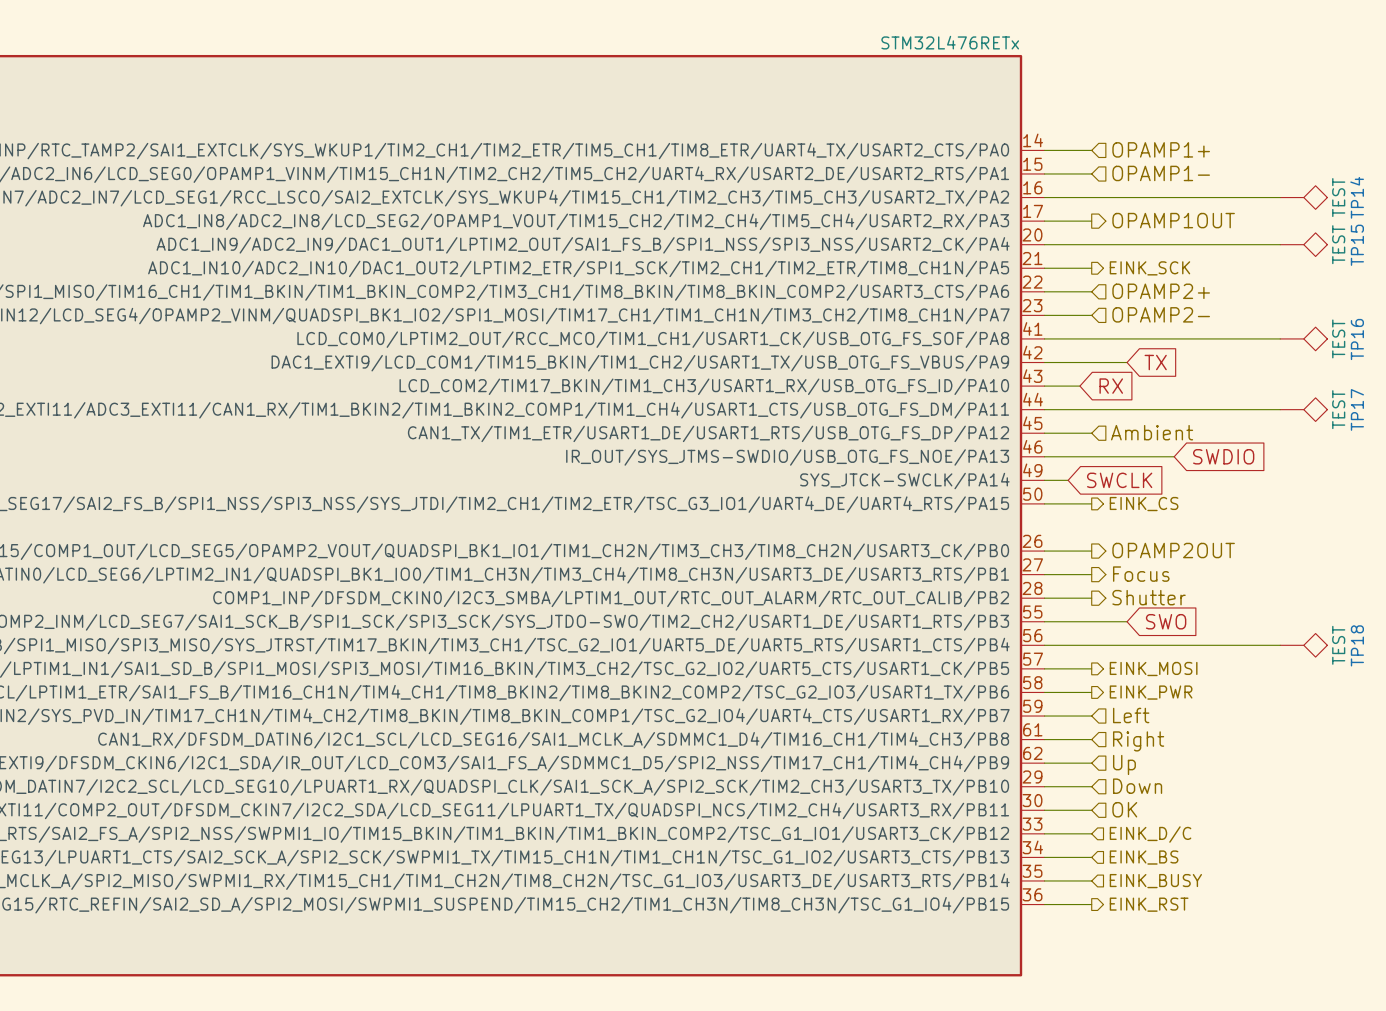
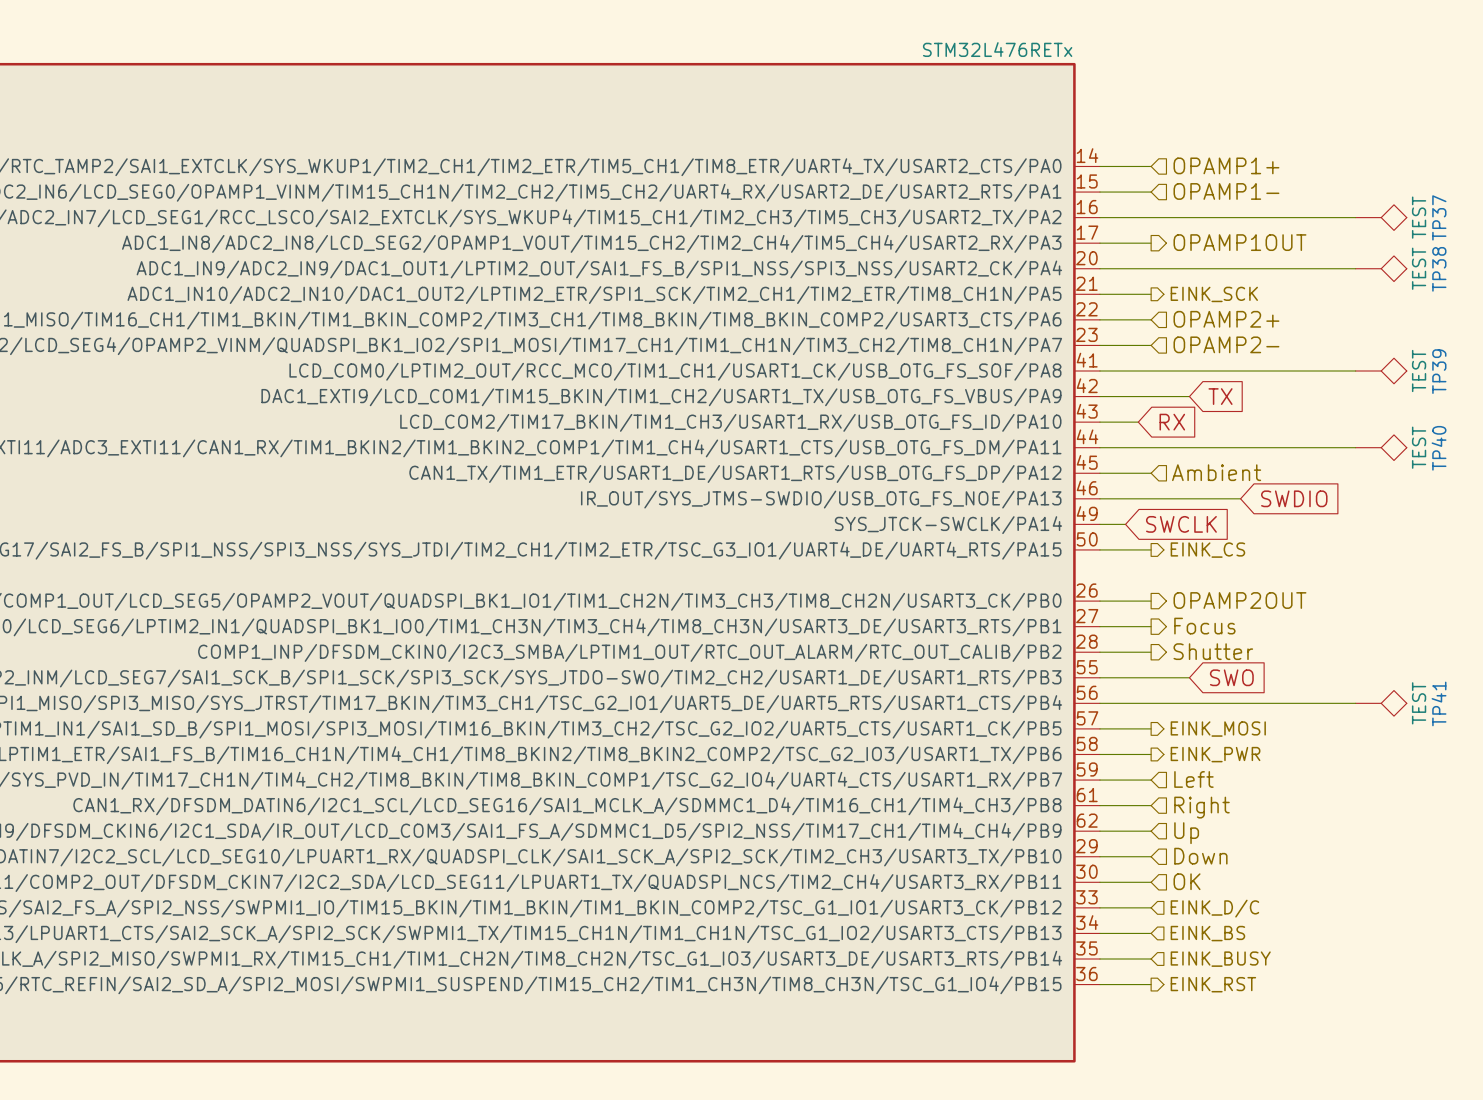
TP14 name: TP14 (1357, 197) -> TP37 (1439, 217)
TP15 name: TP15 (1357, 245) -> TP38 (1439, 269)
TP16 name: TP16 (1357, 339) -> TP39 (1439, 371)
TP17 name: TP17 (1357, 409) -> TP40 (1439, 448)
TP18 name: TP18 (1357, 645) -> TP41 (1439, 703)

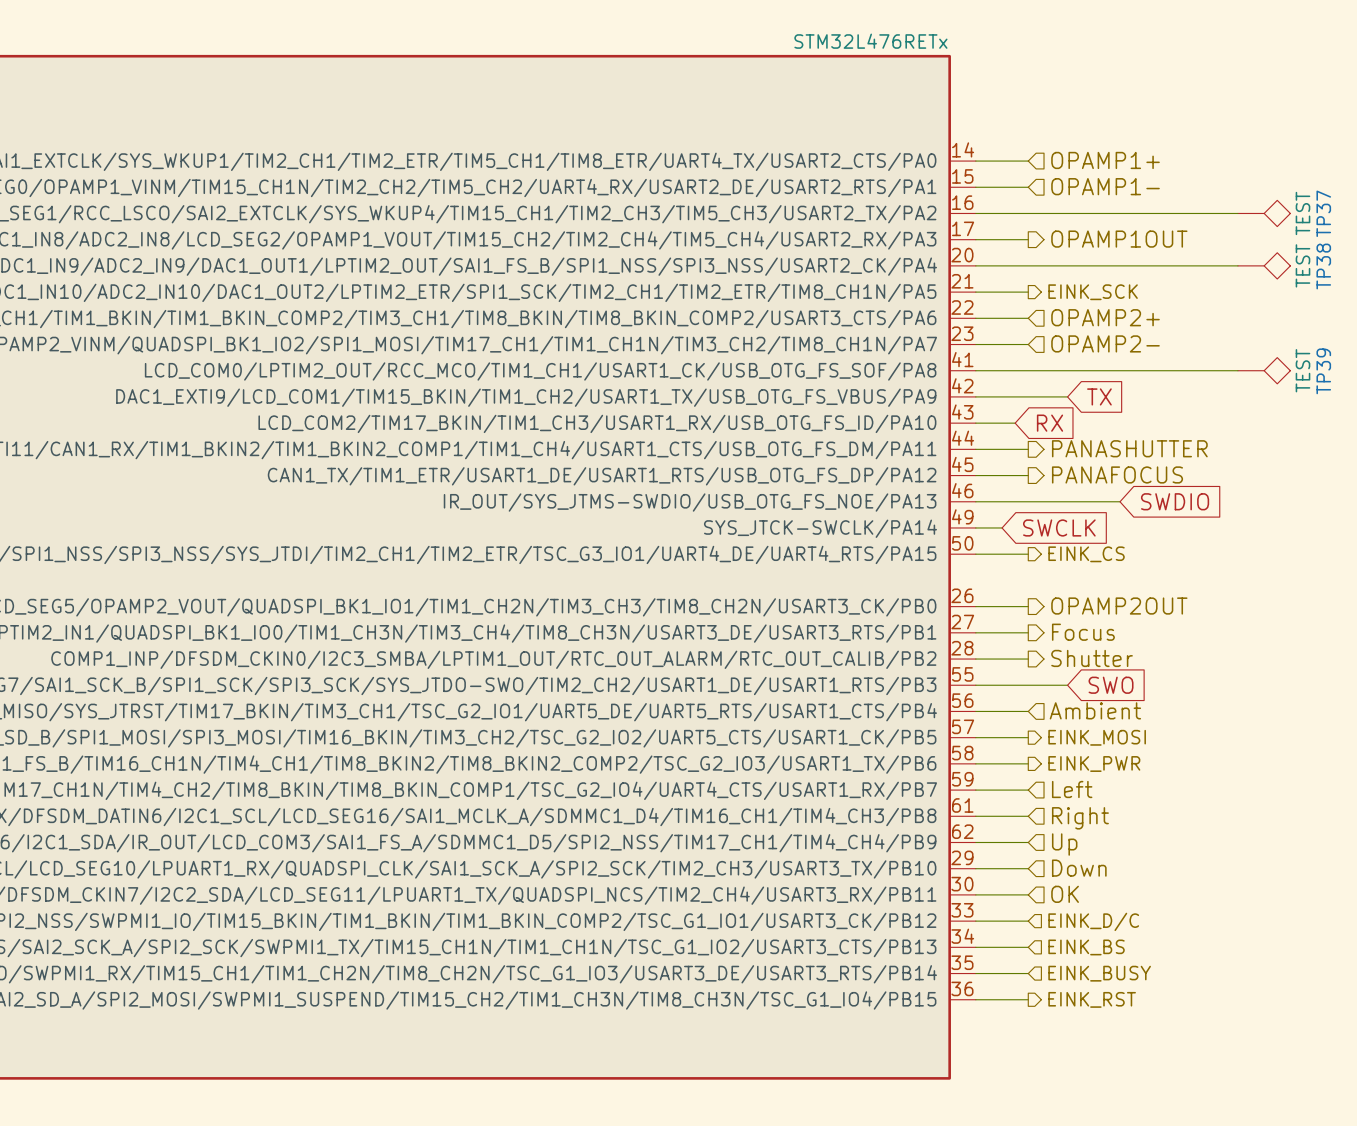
wire: (1151, 447) (1355, 447) -> none
hierarchical label: none -> PANASHUTTER (1129, 448)
TP40: TEST (1381, 447) -> none
hierarchical label shape: input (1216, 472) -> output (1117, 474)
hierarchical label: Ambient (1216, 472) -> PANAFOCUS (1117, 474)
hierarchical label: none -> Ambient (1095, 710)
wire: (1151, 703) (1355, 703) -> none
TP41: TEST (1381, 703) -> none

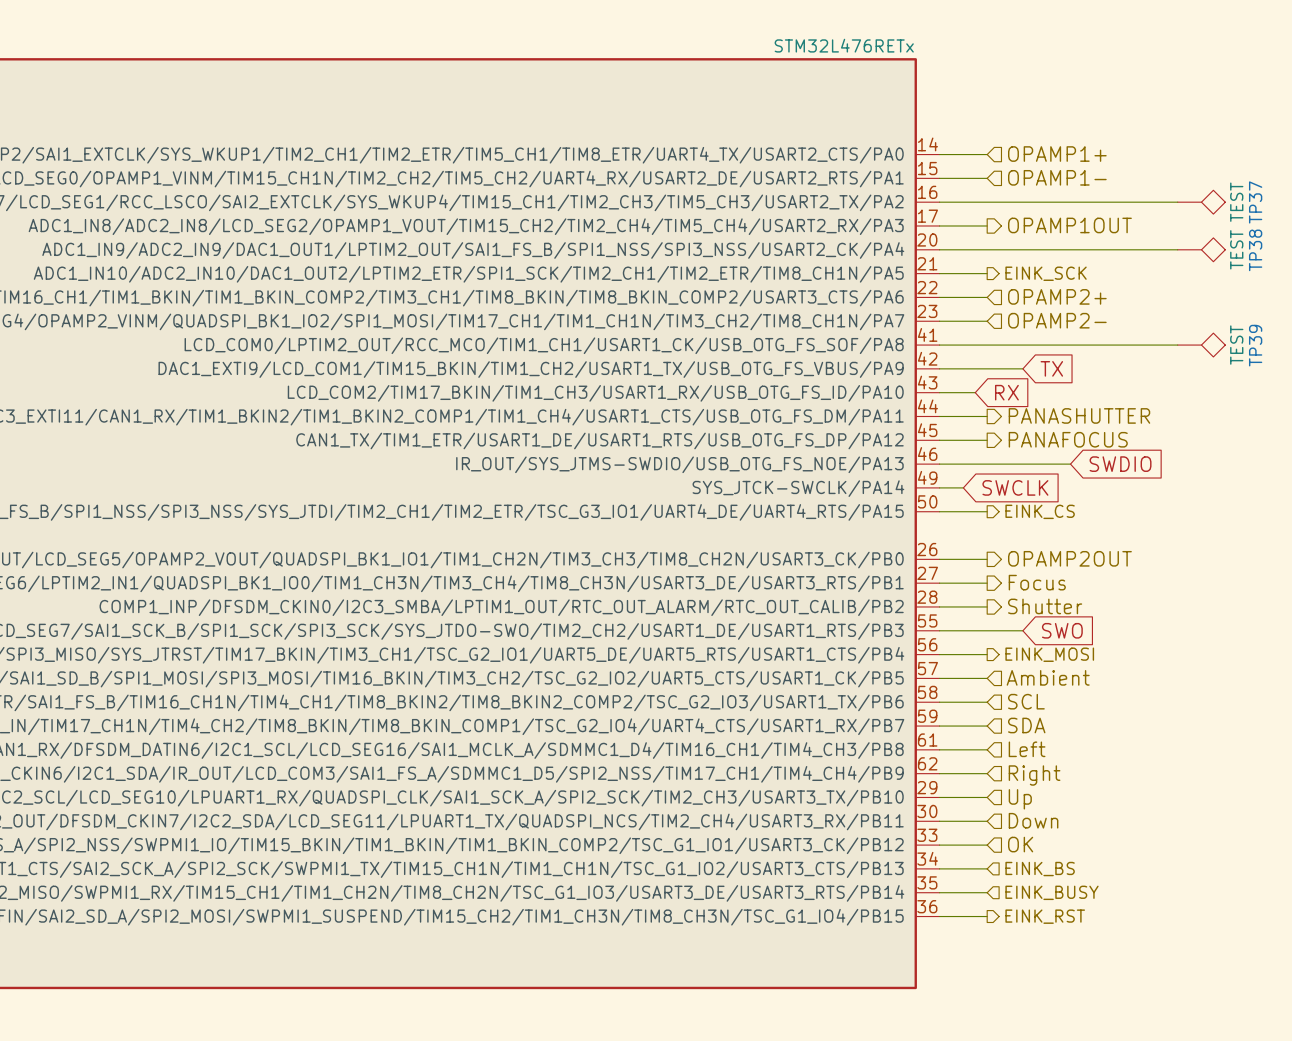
hierarchical label shape: input (1095, 710) -> output (1049, 654)
hierarchical label: Ambient (1095, 710) -> EINK_MOSI (1049, 654)
hierarchical label shape: output (1097, 737) -> input (1048, 677)
hierarchical label: EINK_MOSI (1097, 737) -> Ambient (1048, 677)
hierarchical label shape: output (1094, 764) -> input (1026, 701)
hierarchical label: EINK_PWR (1094, 764) -> SCL (1026, 701)
hierarchical label: Left (1072, 789) -> SDA (1026, 725)
hierarchical label: Right (1080, 818) -> Left (1027, 749)
hierarchical label: Up (1064, 844) -> Right (1034, 775)
hierarchical label: Down (1079, 868) -> Up (1020, 799)
hierarchical label: OK (1065, 894) -> Down (1033, 820)
hierarchical label: EINK_D/C (1093, 921) -> OK (1020, 844)

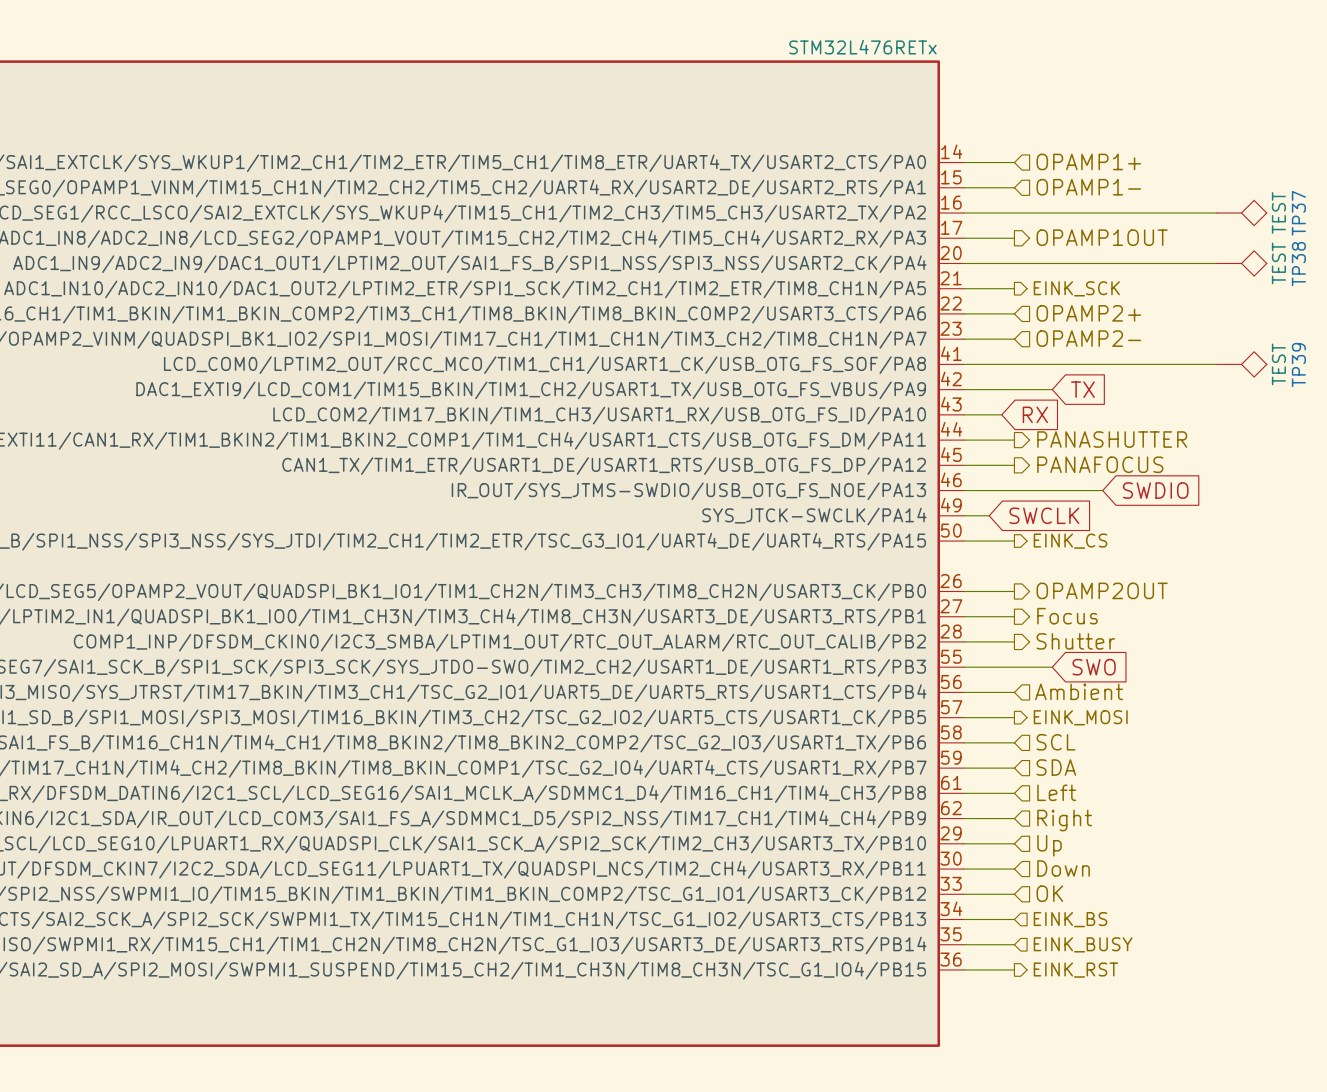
hierarchical label shape: output (1049, 654) -> input (1079, 691)
hierarchical label: EINK_MOSI (1049, 654) -> Ambient (1079, 691)
hierarchical label shape: input (1048, 677) -> output (1080, 717)
hierarchical label: Ambient (1048, 677) -> EINK_MOSI (1080, 717)

